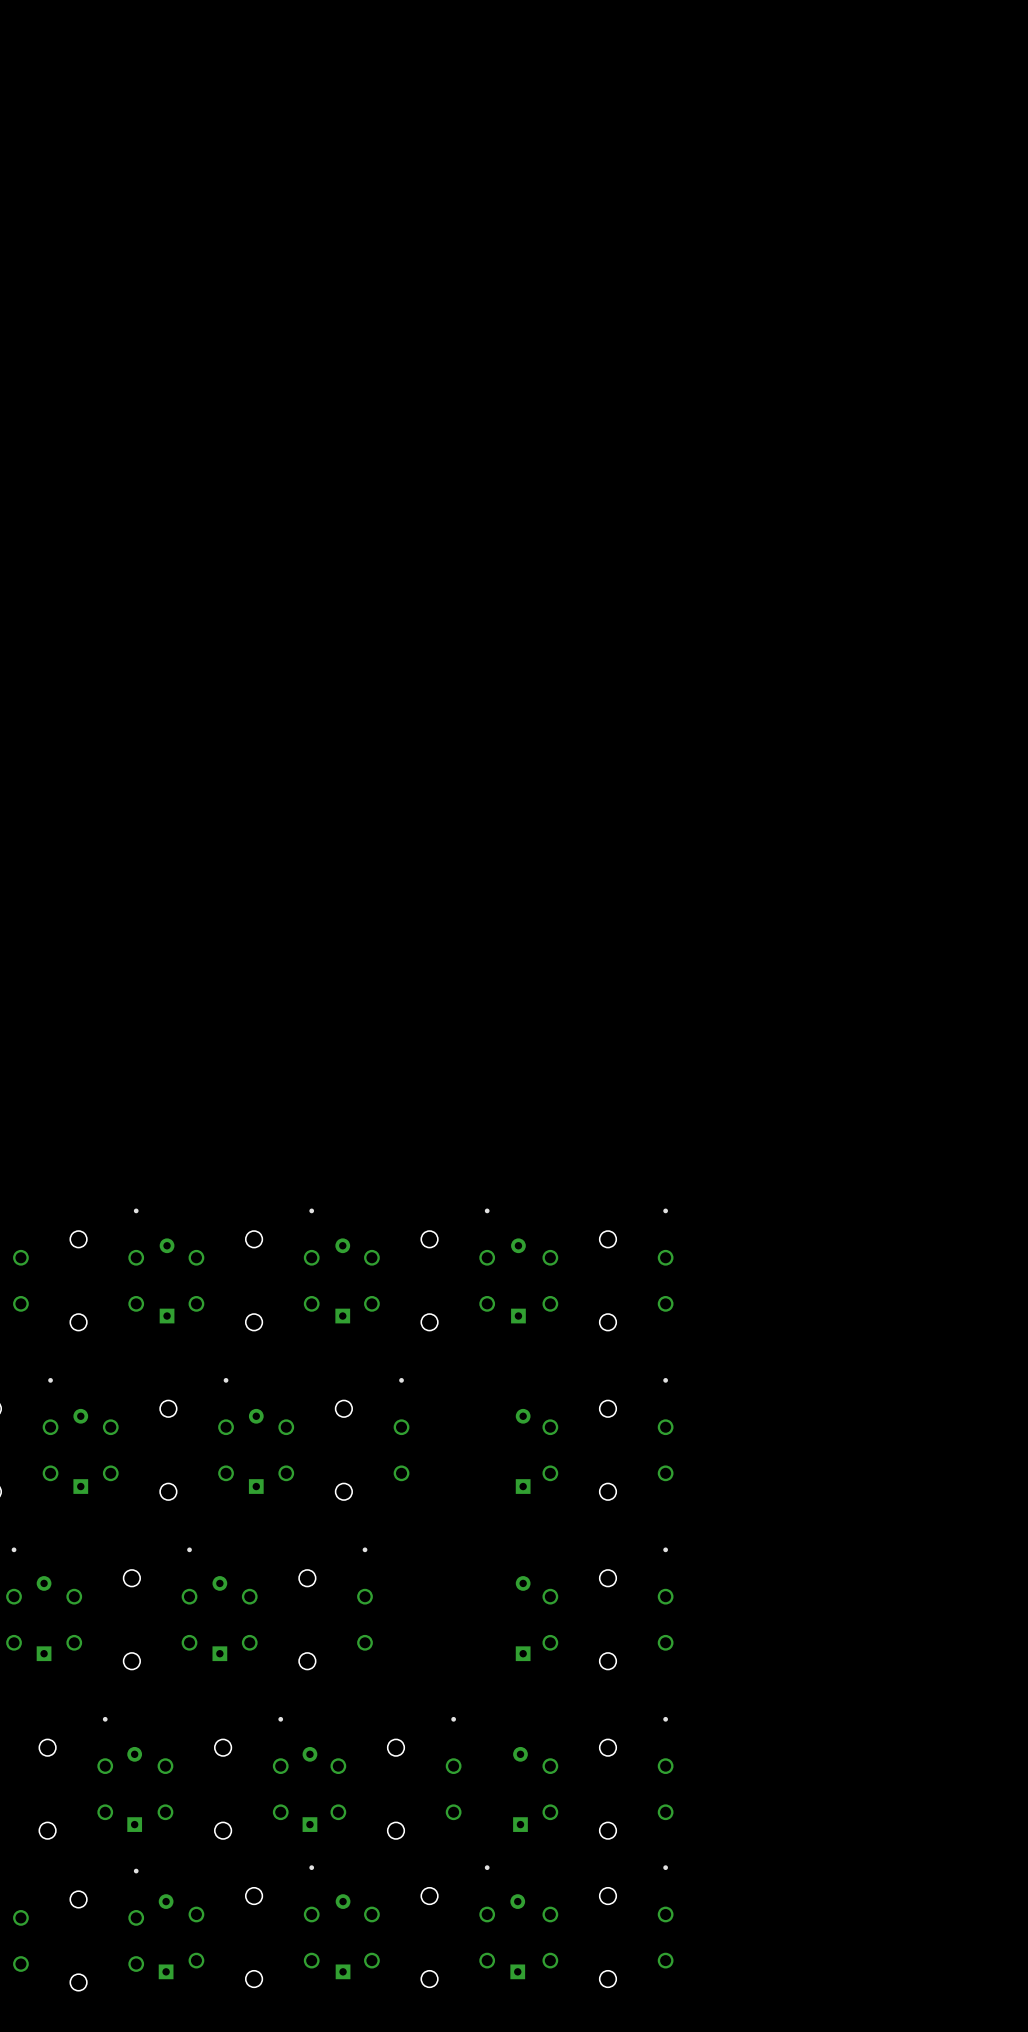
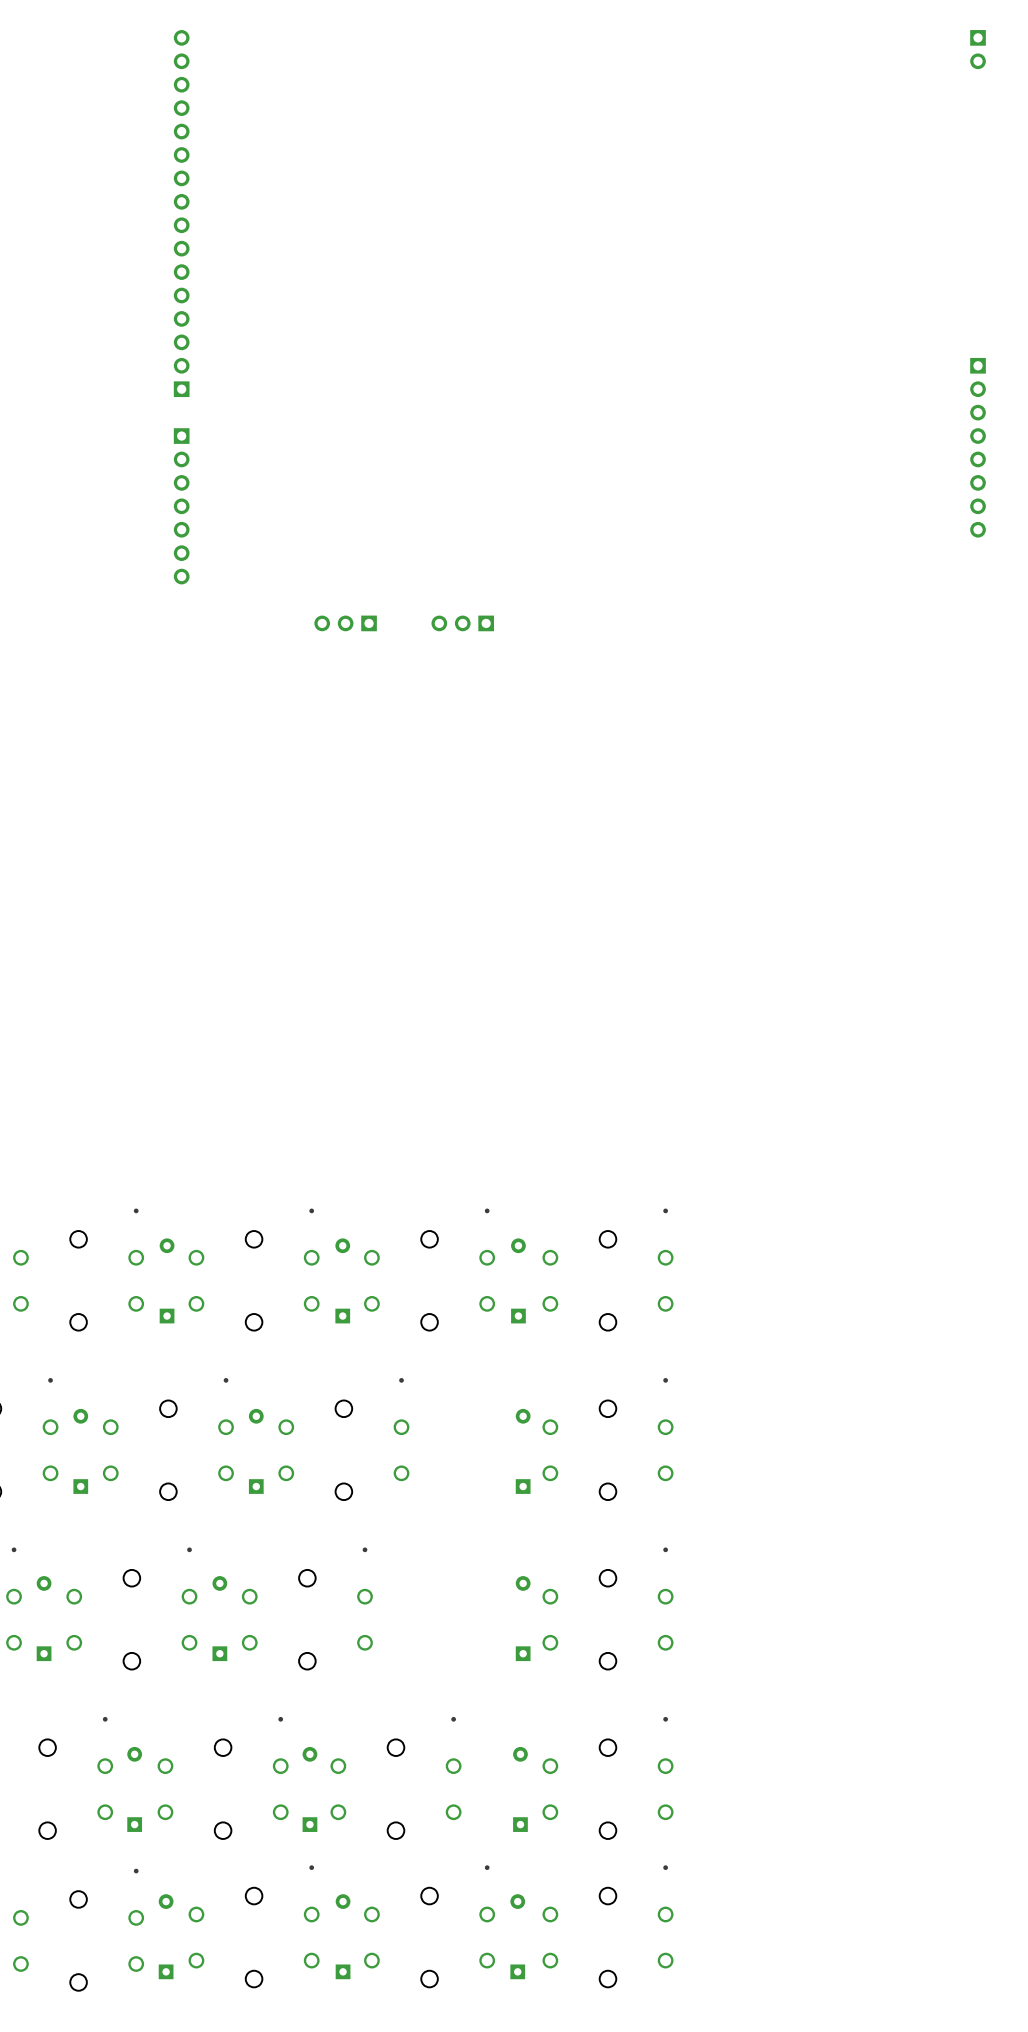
part: none -> (978, 49)
part: none -> (181, 213)
part: none -> (978, 447)
part: none -> (181, 506)
part: none -> (345, 623)
part: none -> (462, 623)

